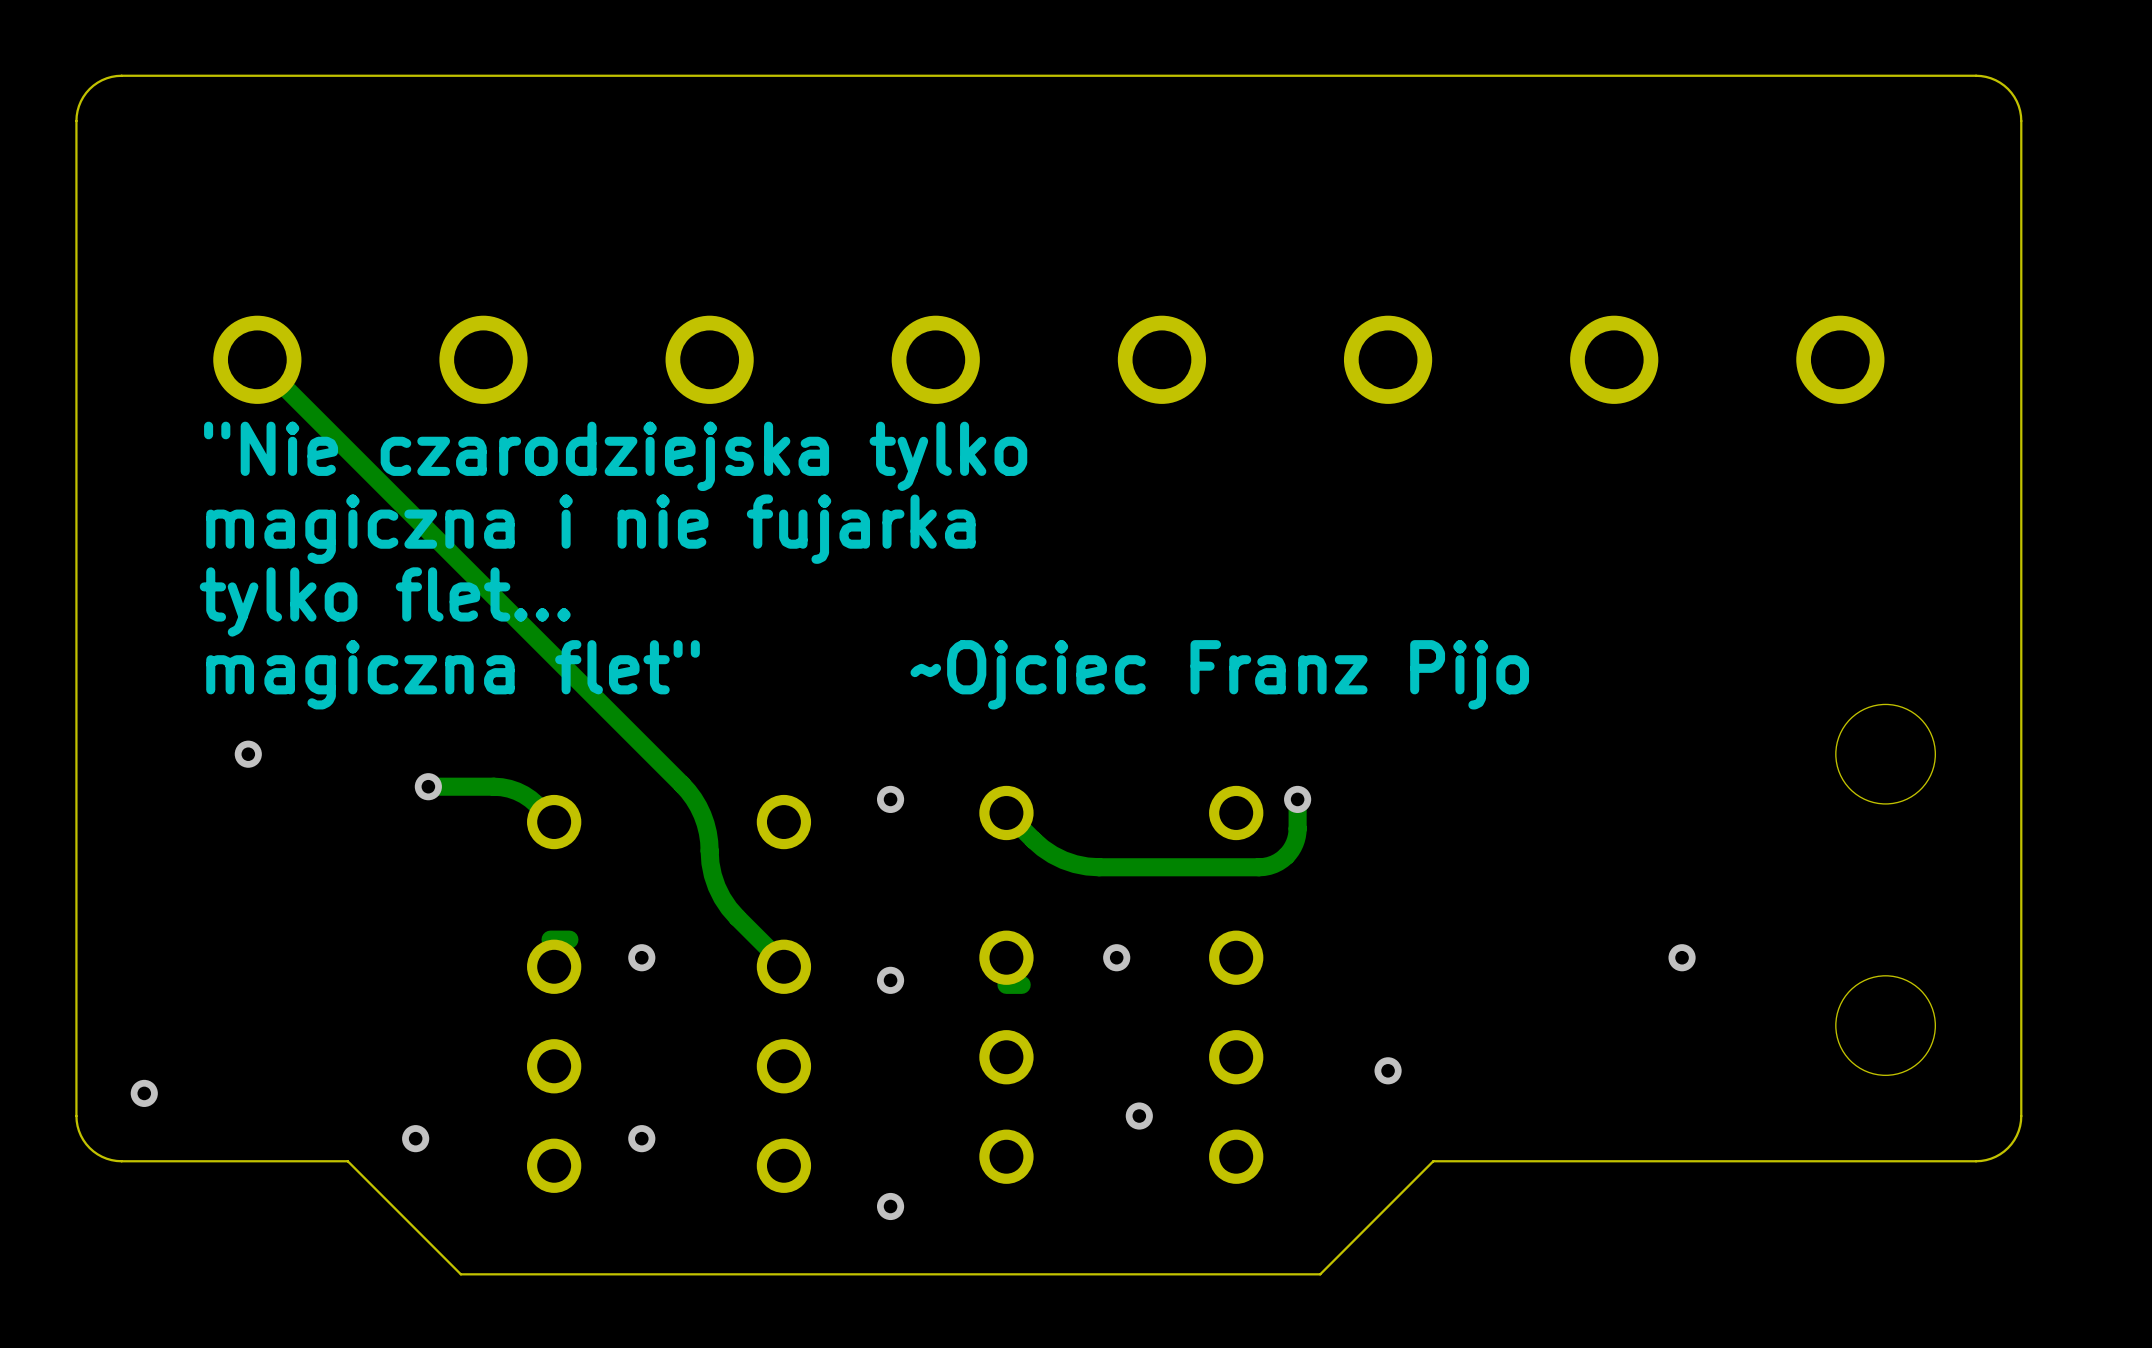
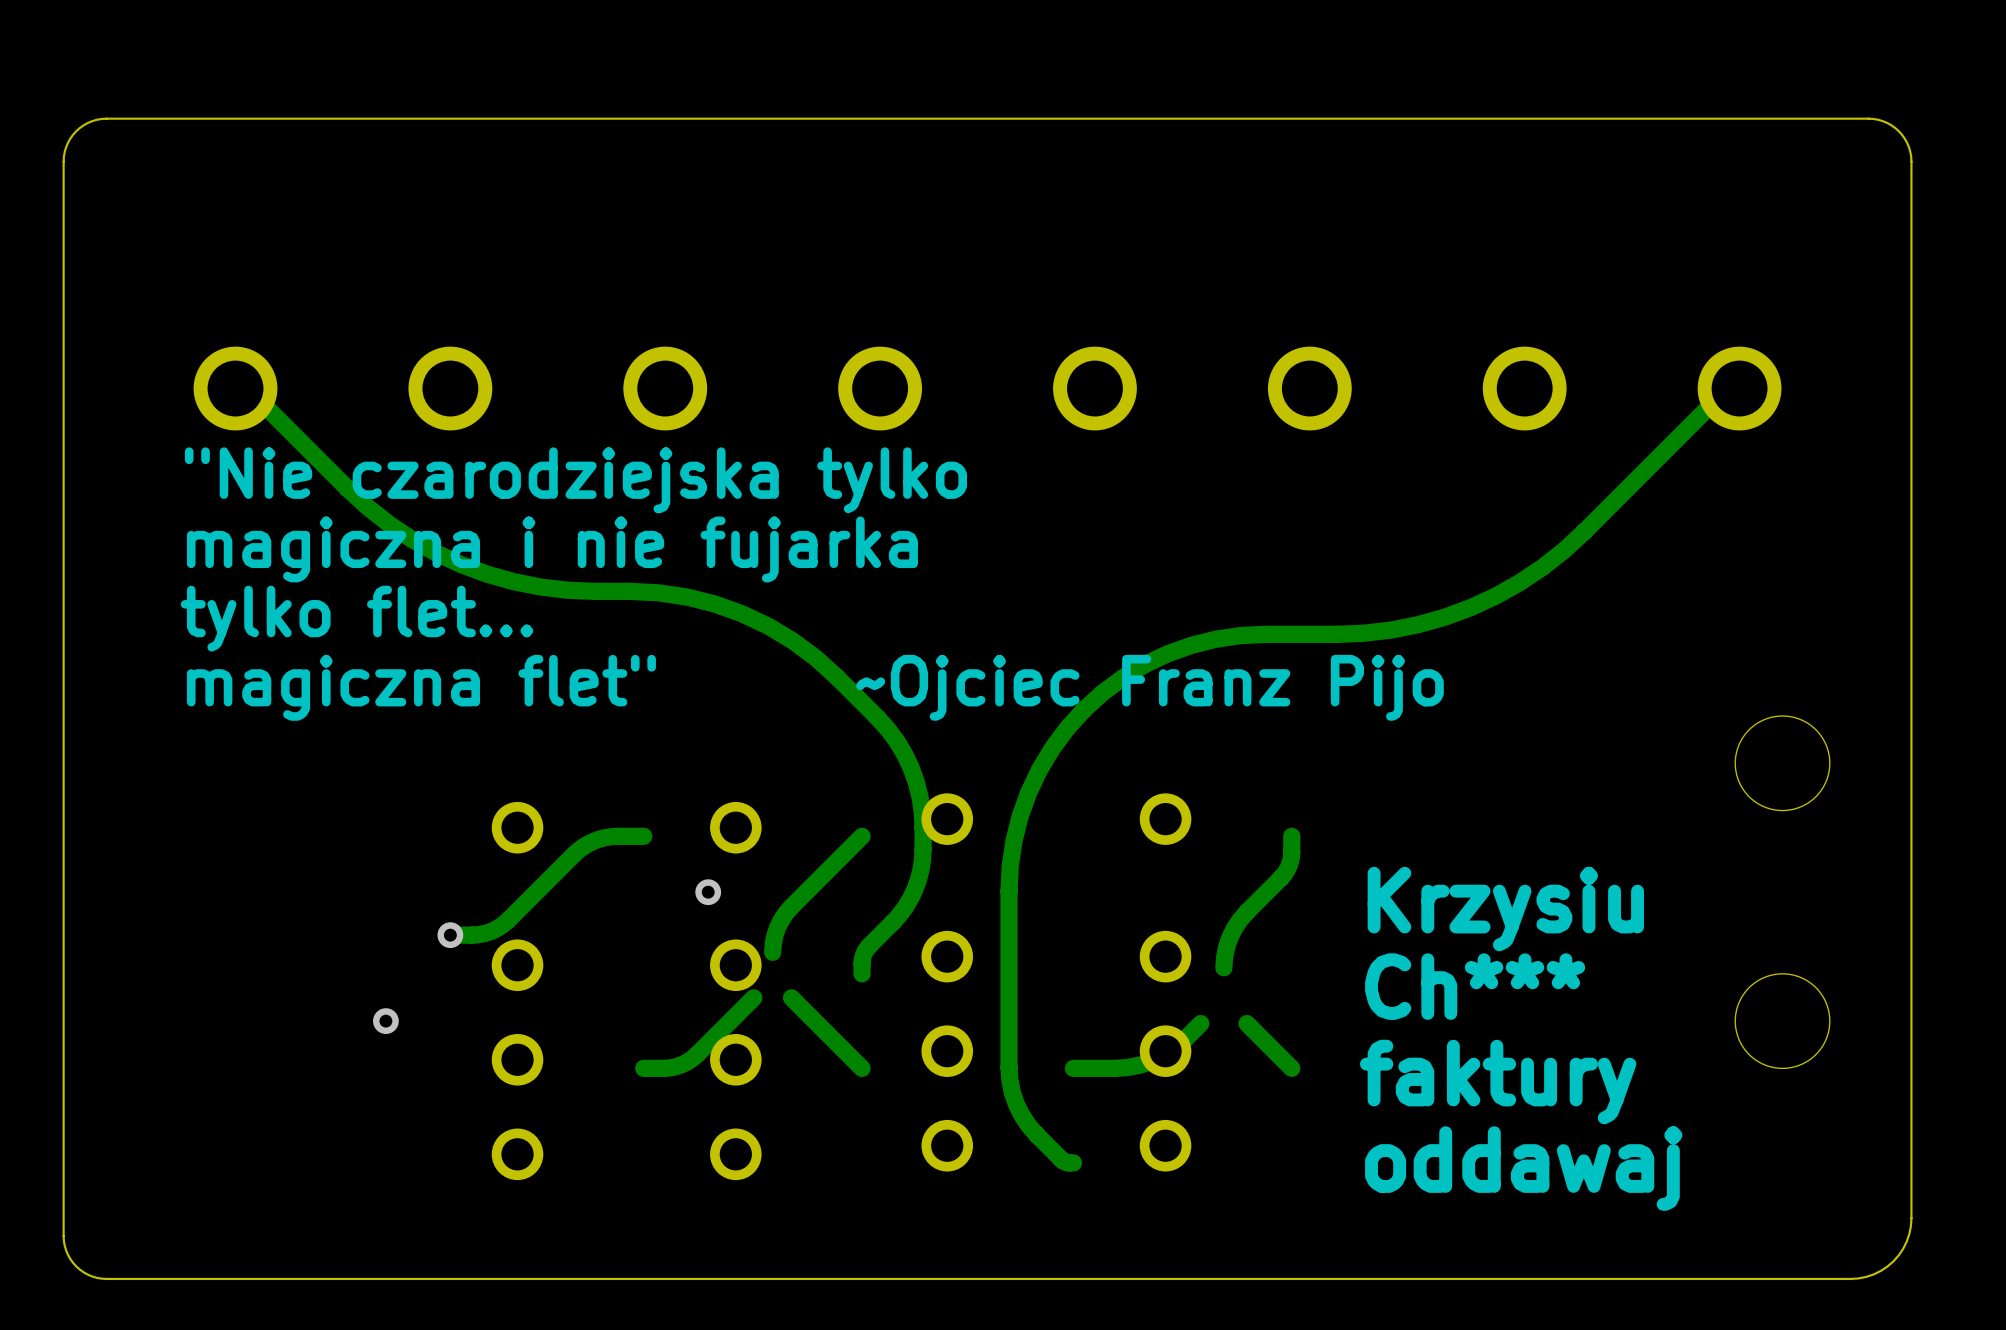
track: none -> (235, 376) (367, 507) (412, 539) (436, 553) (487, 574) (540, 587) (568, 590) (658, 592) (714, 604) (767, 626) (792, 640) (837, 677) (877, 717) (896, 741) (911, 768) (922, 812) (922, 859) (915, 888) (899, 915) (865, 951) (862, 960) (862, 973)
track: none -> (1739, 376) (1564, 550) (1542, 567) (1495, 596) (1444, 617) (1391, 630) (1336, 634) (1240, 635) (1191, 645) (1144, 664) (1123, 677) (1084, 709) (1067, 728) (1039, 770) (1020, 816) (1013, 841) (1009, 891) (1009, 1067) (1012, 1092) (1021, 1115) (1028, 1125) (1062, 1160) (1073, 1162)
track: (257, 359) (688, 791) (698, 806) (705, 823) (712, 875) (722, 897) (737, 917) (783, 963) (783, 966) -> none
via: (248, 754) -> none
track: (428, 786) (493, 786) (509, 788) (530, 799) (554, 822) -> none
via: (428, 786) -> none
via: (890, 799) -> none
track: (1297, 799) (1297, 832) (1293, 846) (1278, 862) (1259, 867) (1099, 867) (1075, 864) (1052, 854) (1042, 848) (1006, 812) -> none
via: (1297, 799) -> none
track: none -> (643, 836) (611, 836) (588, 843) (573, 854) (508, 919) (497, 928) (478, 934) (450, 935)
track: none -> (862, 836) (785, 913) (774, 935) (772, 952)
track: none -> (1291, 836) (1291, 855) (1287, 869) (1246, 912) (1234, 928) (1226, 947) (1223, 967)
via: none -> (708, 892)
text: none -> Krzysiu (1505, 909)
via: none -> (450, 935)
track: (569, 939) (550, 939) -> none
via: (641, 957) -> none
via: (1116, 957) -> none
via: (1682, 957) -> none
via: (890, 980) -> none
track: (1021, 984) (1006, 984) -> none
text: none -> Ch*** (1475, 986)
track: none -> (753, 997) (687, 1061) (669, 1067) (643, 1068)
track: none -> (791, 997) (862, 1068)
via: none -> (385, 1021)
track: none -> (1200, 1023) (1175, 1047) (1152, 1060) (1127, 1067) (1073, 1068)
track: none -> (1246, 1023) (1291, 1068)
via: (1388, 1070) -> none
text: none -> faktury (1498, 1082)
via: (144, 1093) -> none
via: (1139, 1116) -> none
board edge: (2021, 1116) (2016, 1135) (2008, 1148) (1995, 1156) (1981, 1160) (1433, 1161) (1320, 1274) (460, 1274) (347, 1161) (116, 1160) (102, 1156) (86, 1144) (78, 1130) (76, 1116) -> (1911, 1107) (1911, 1218) (1906, 1241) (1898, 1255) (1887, 1266) (1866, 1276) (1850, 1278) (101, 1278) (87, 1274) (76, 1266) (70, 1258) (64, 1245) (63, 1107)
via: (415, 1138) -> none
via: (641, 1138) -> none
text: none -> oddawaj (1523, 1168)
via: (890, 1206) -> none

